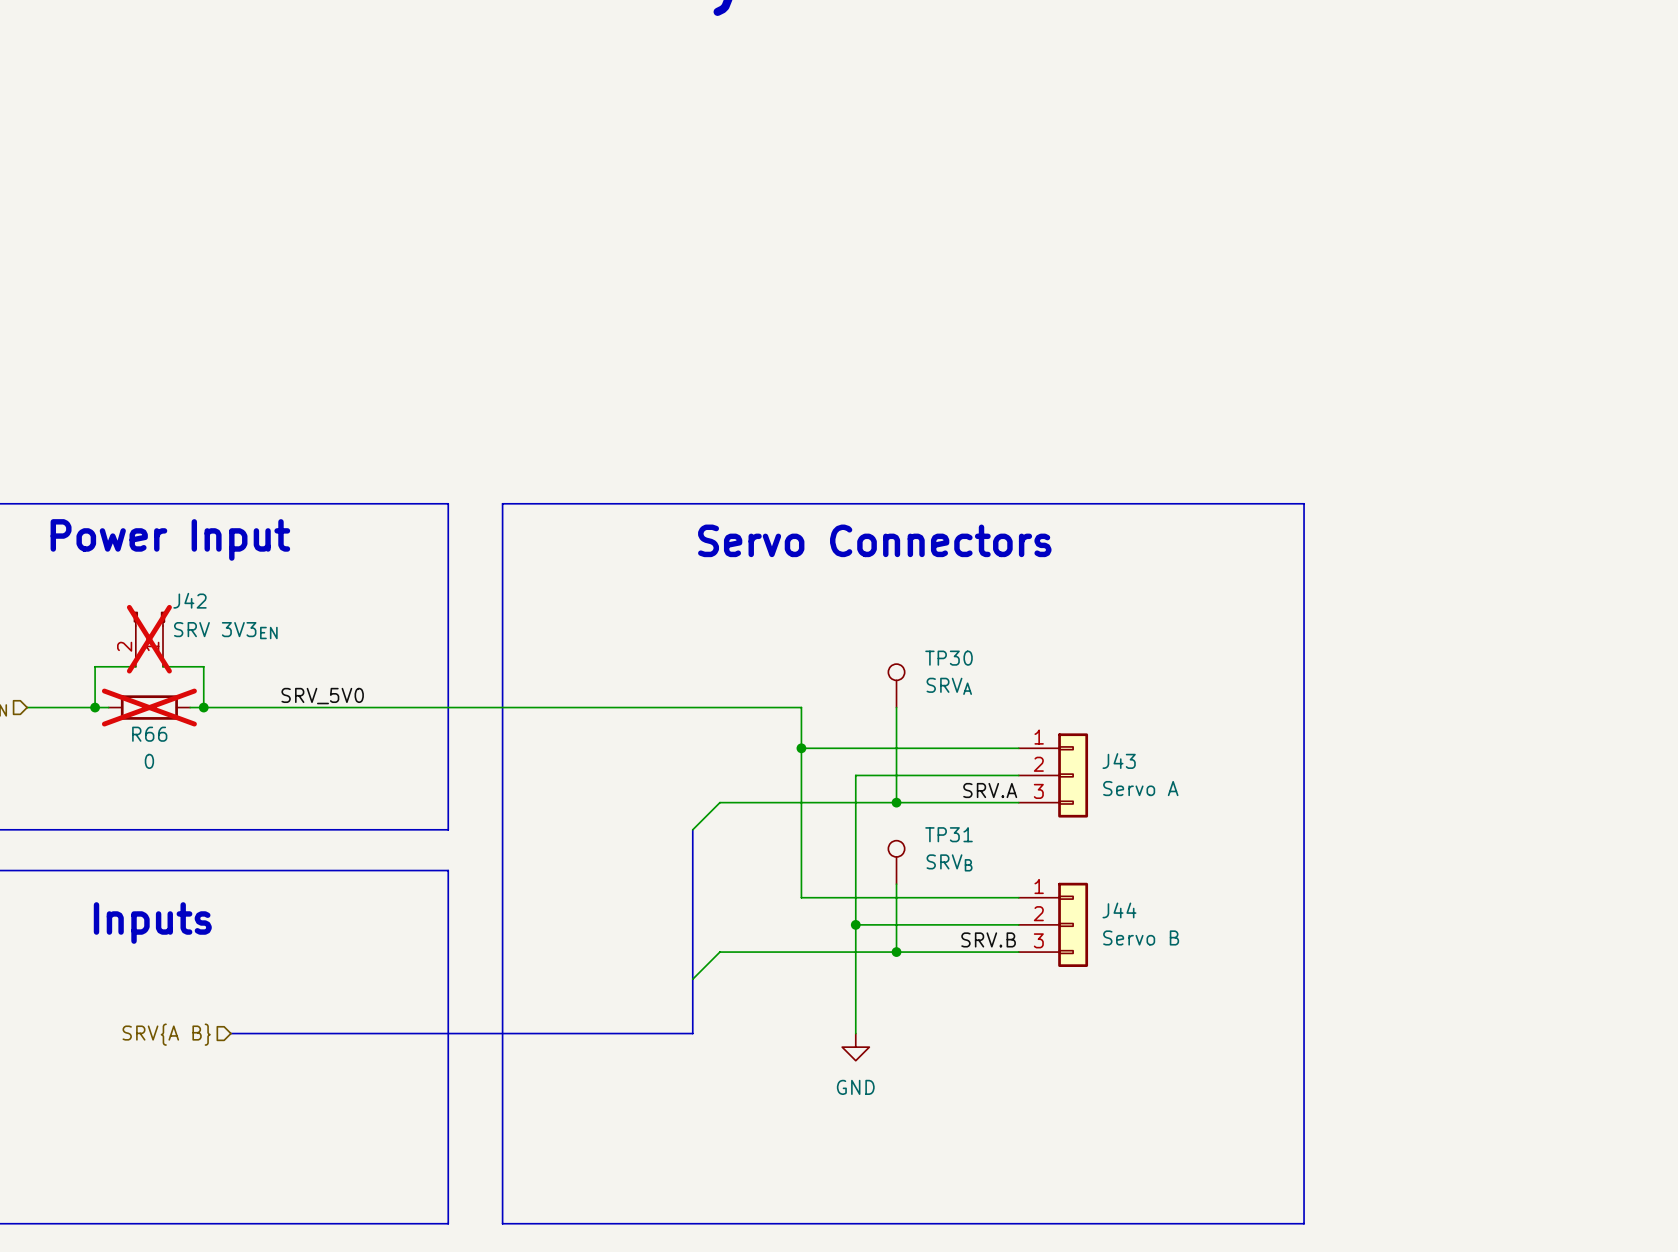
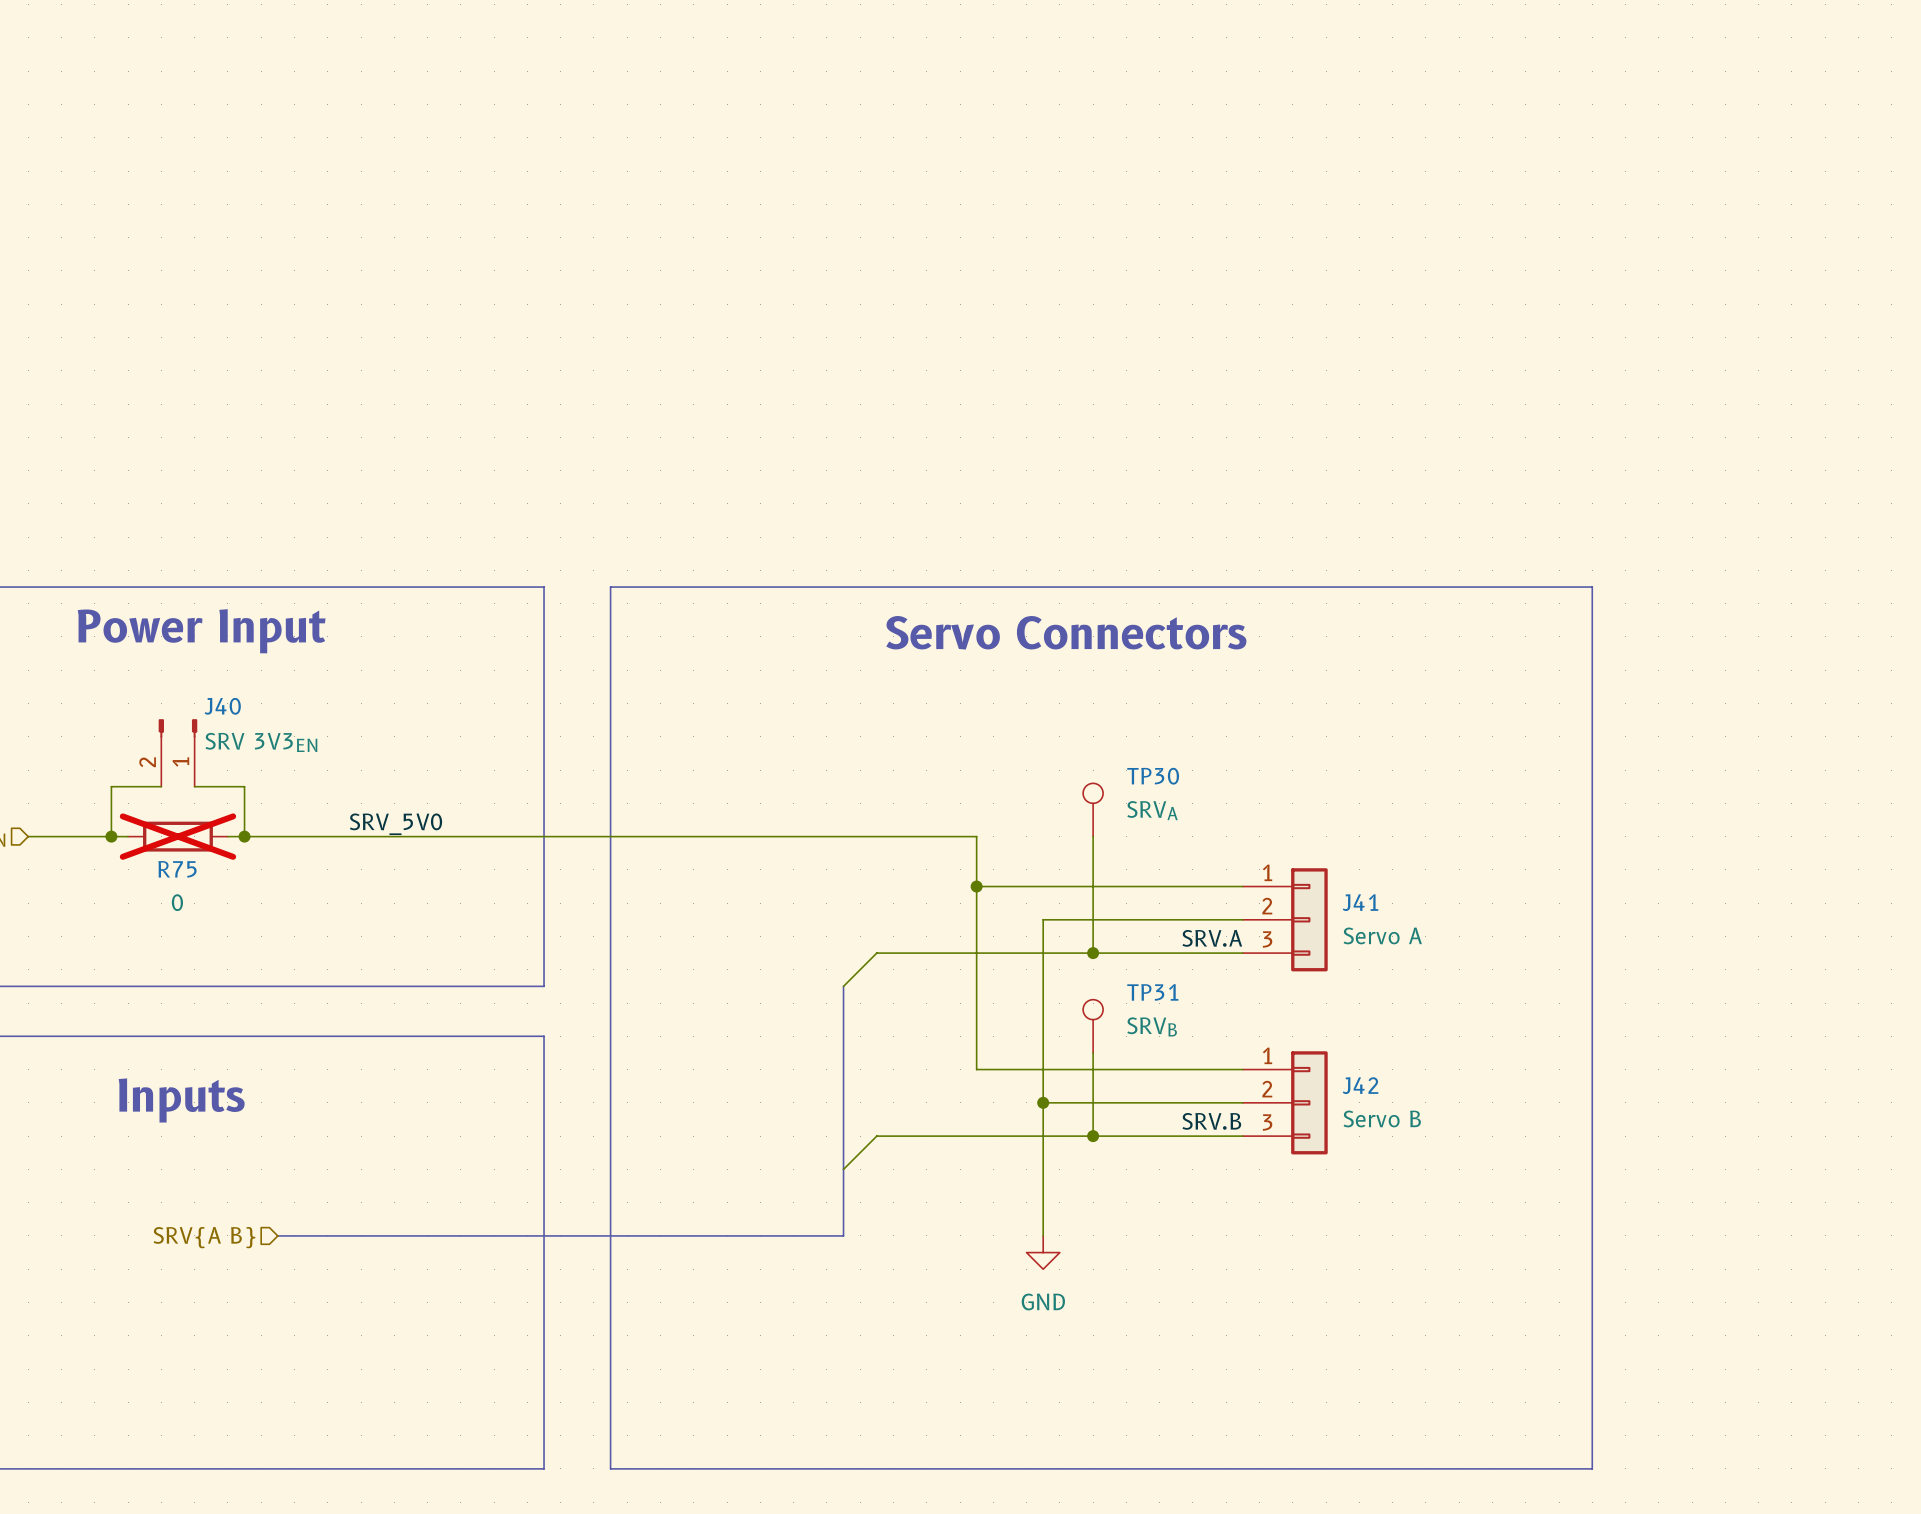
J42 name: J42 (190, 600) -> J40 (222, 706)
J42 do-not-place cross: (149, 639) -> none
R66 name: R66 (149, 734) -> R75 (177, 869)
J43 name: J43 (1119, 761) -> J41 (1360, 902)
J44 name: J44 (1119, 910) -> J42 (1360, 1085)

